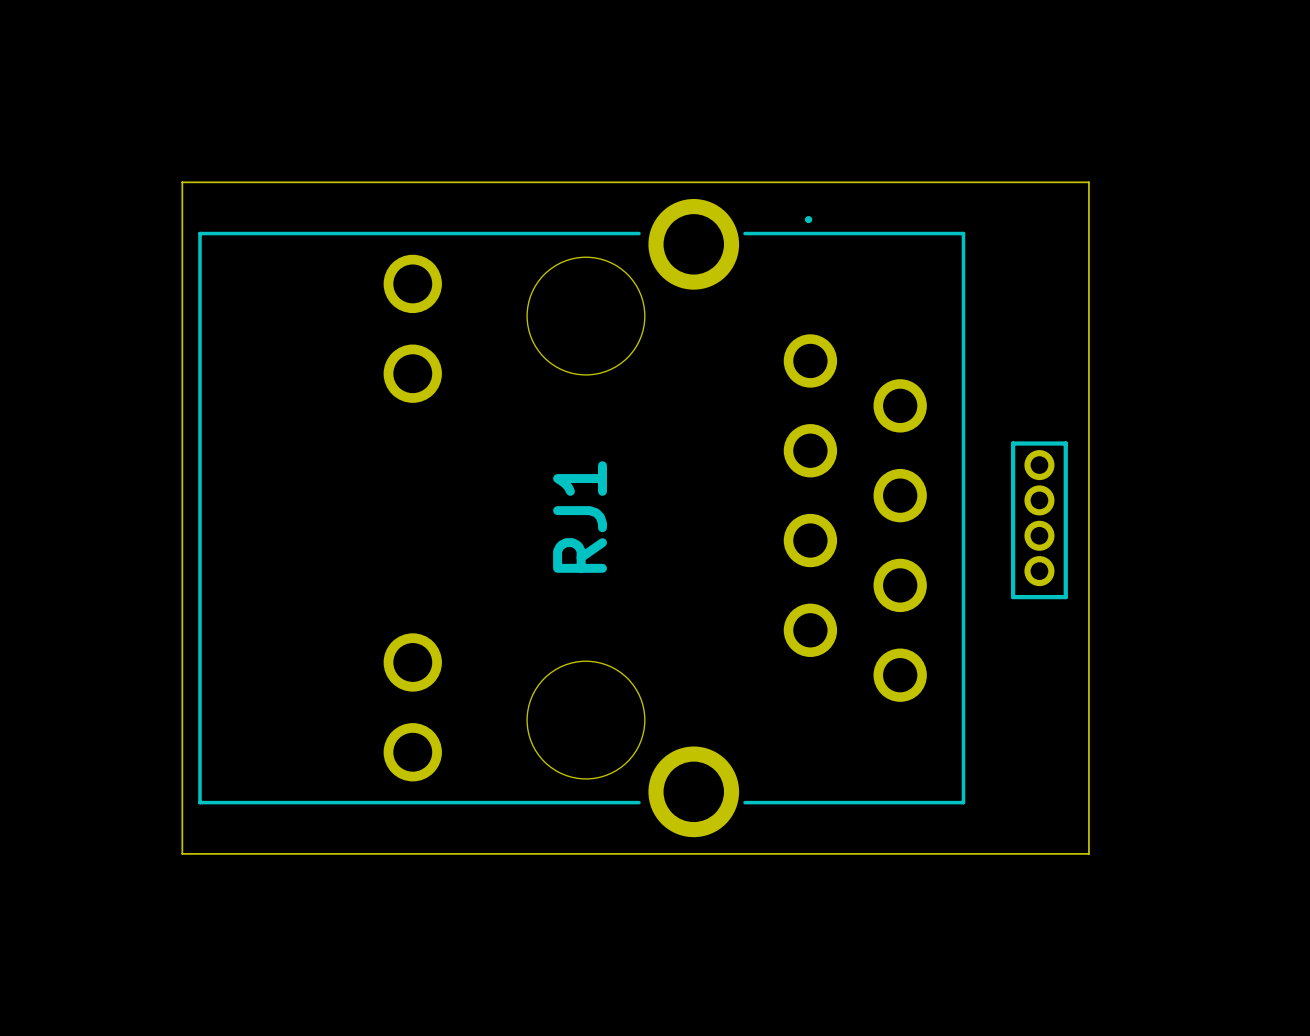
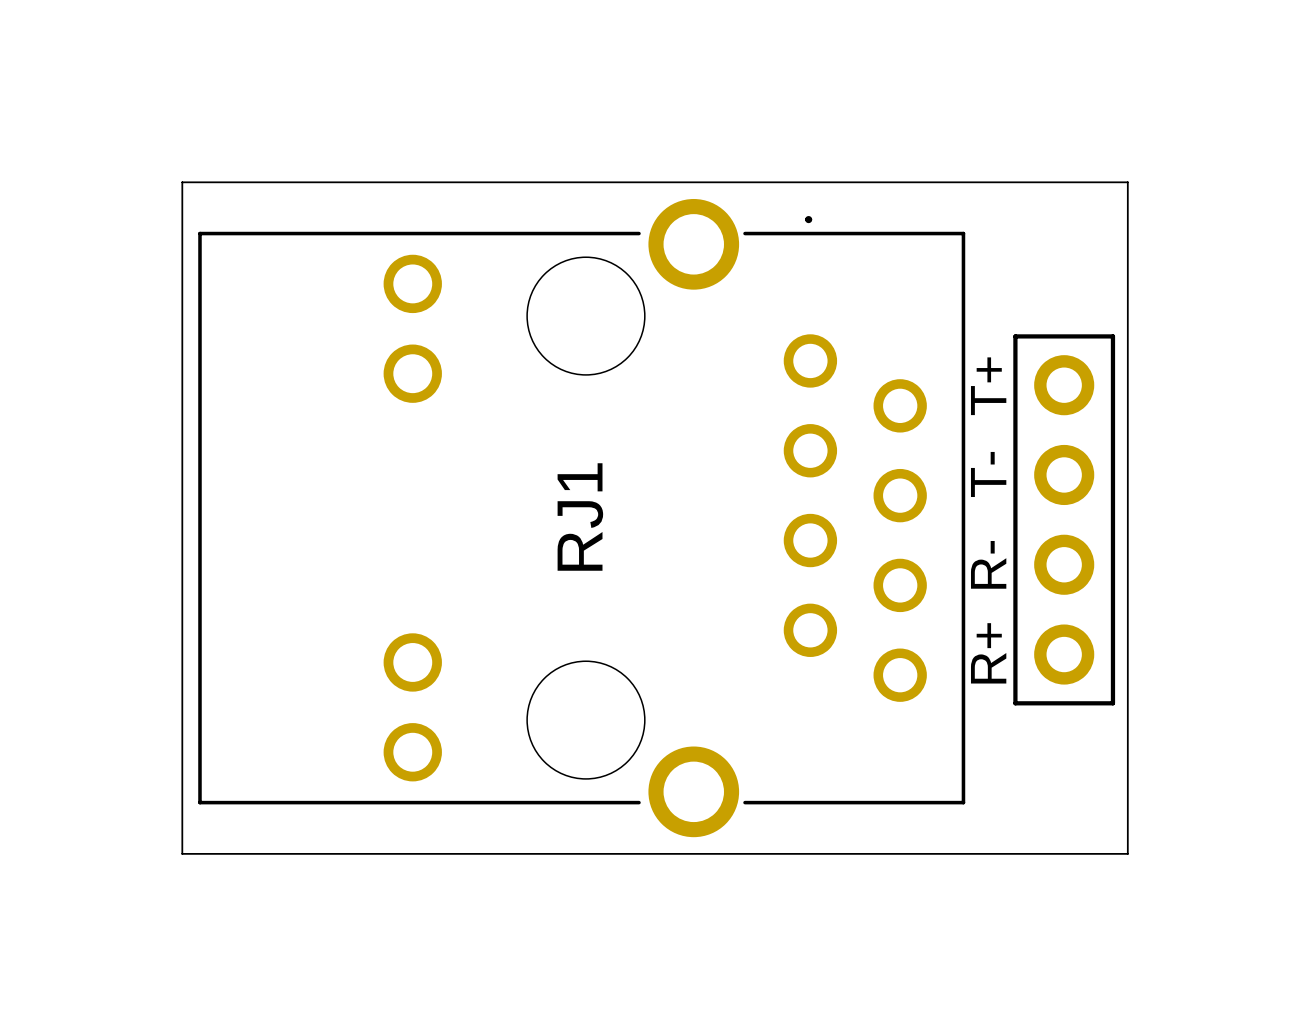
board edge: (1088, 182) (1088, 853) -> (1088, 182) (1127, 182) (1127, 853) (1088, 853)
text: none -> T+ (988, 386)
part footprint: [1011, 441, 1068, 600] -> [1013, 334, 1116, 706]
text: none -> T- (988, 474)
text: none -> R- (988, 564)
text: none -> R+ (988, 653)

